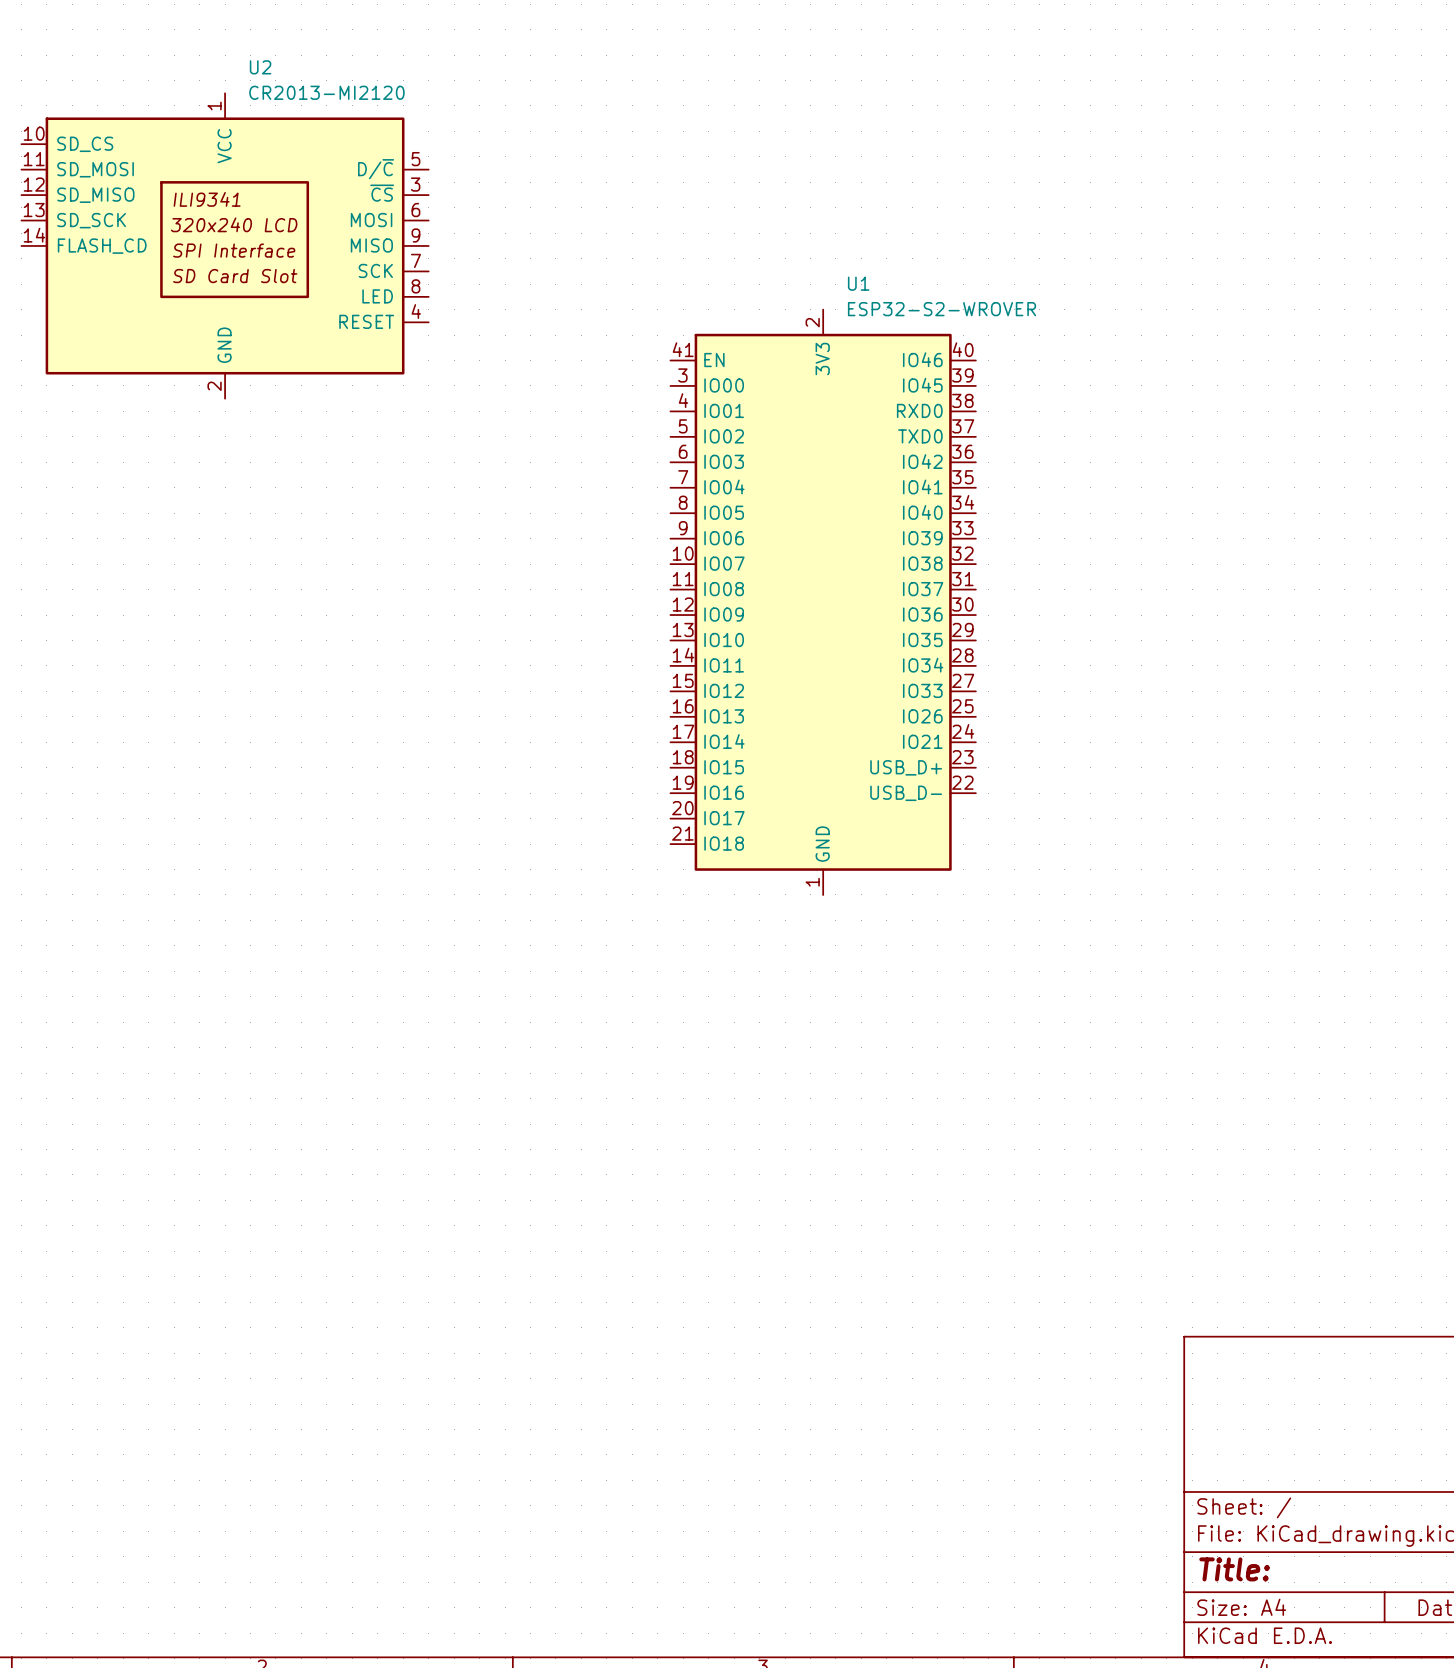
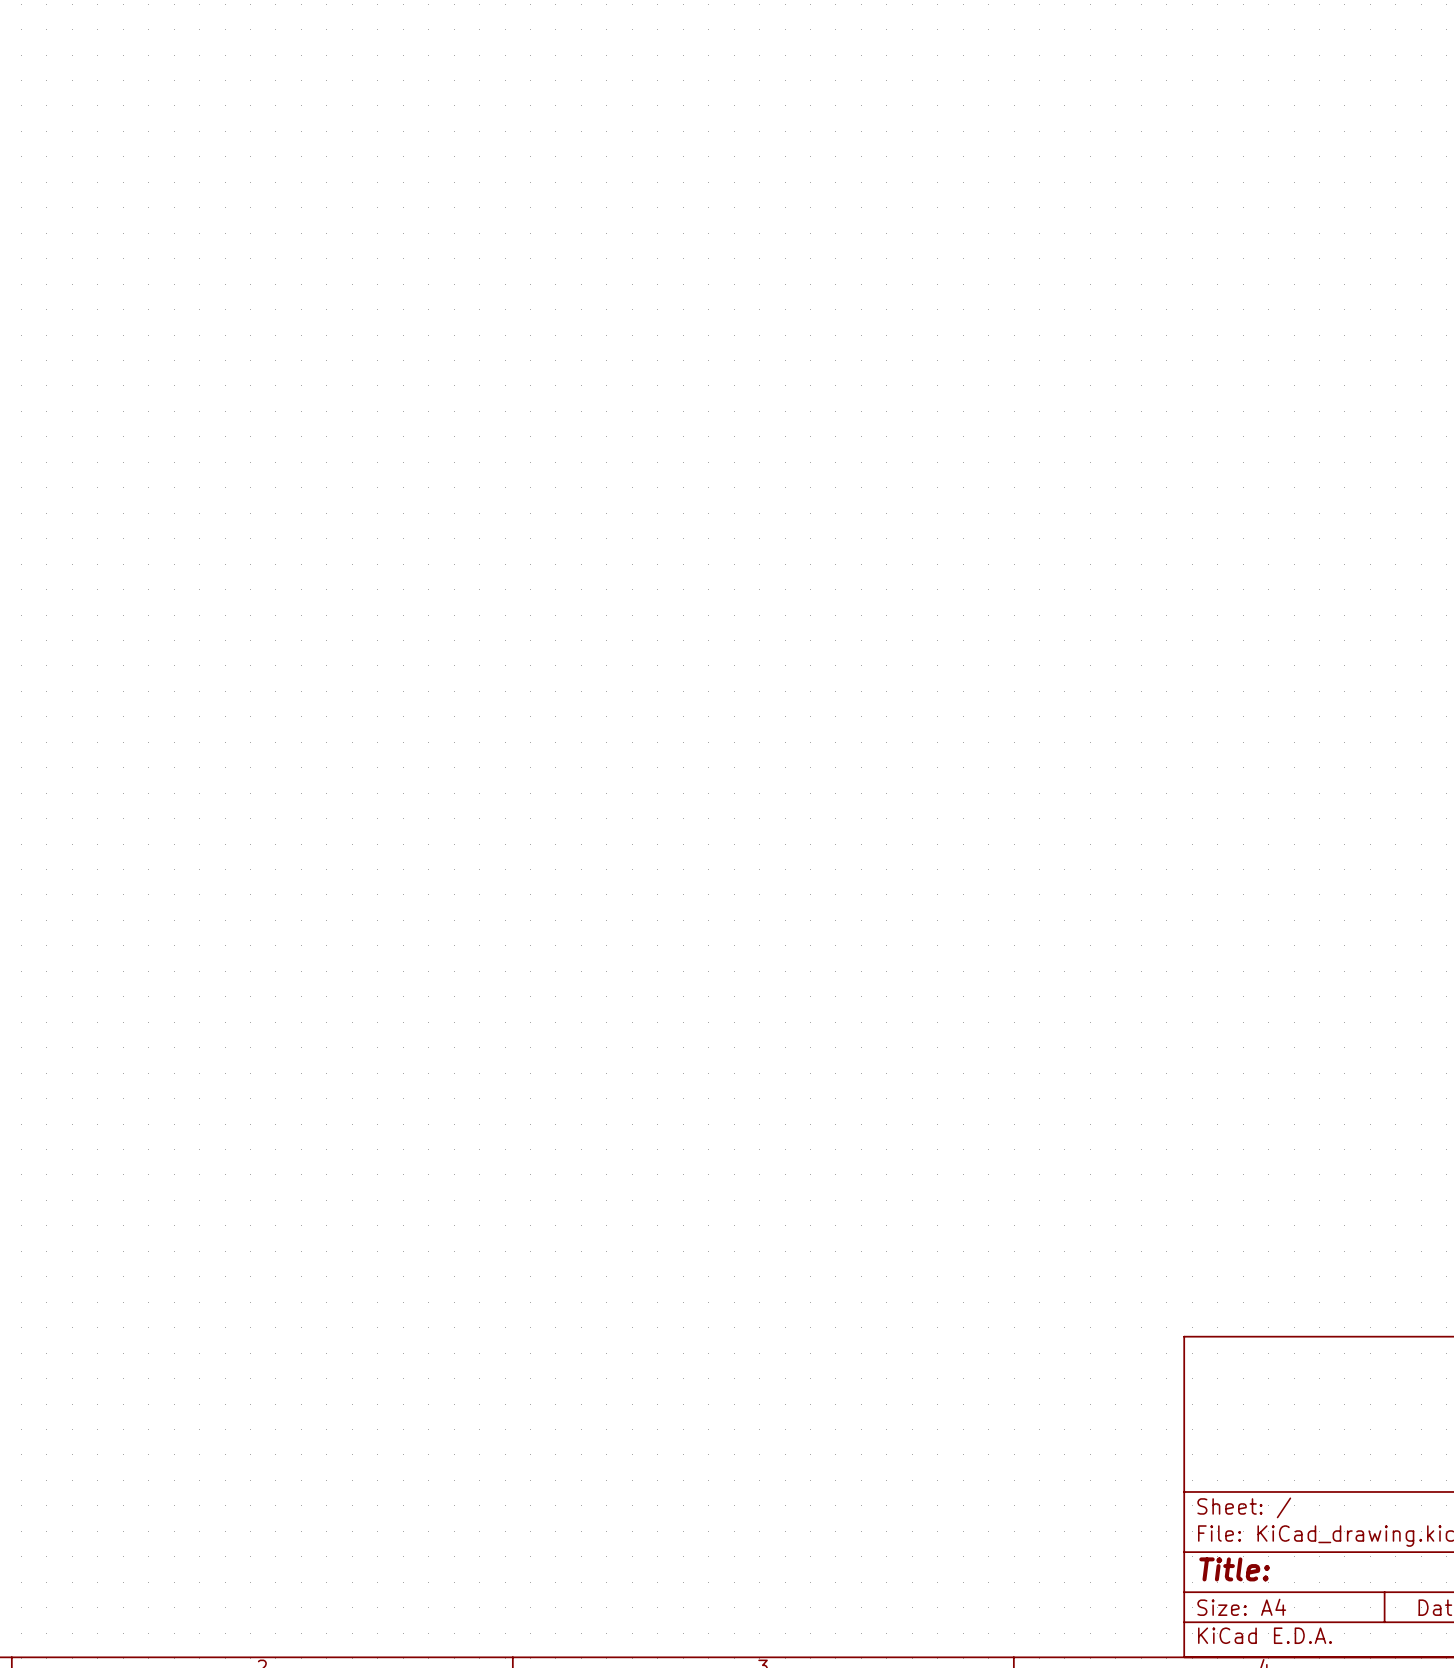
U2: CR2013-MI2120 (225, 245) -> none
U1: ESP32-S2-WROVER (823, 602) -> none

